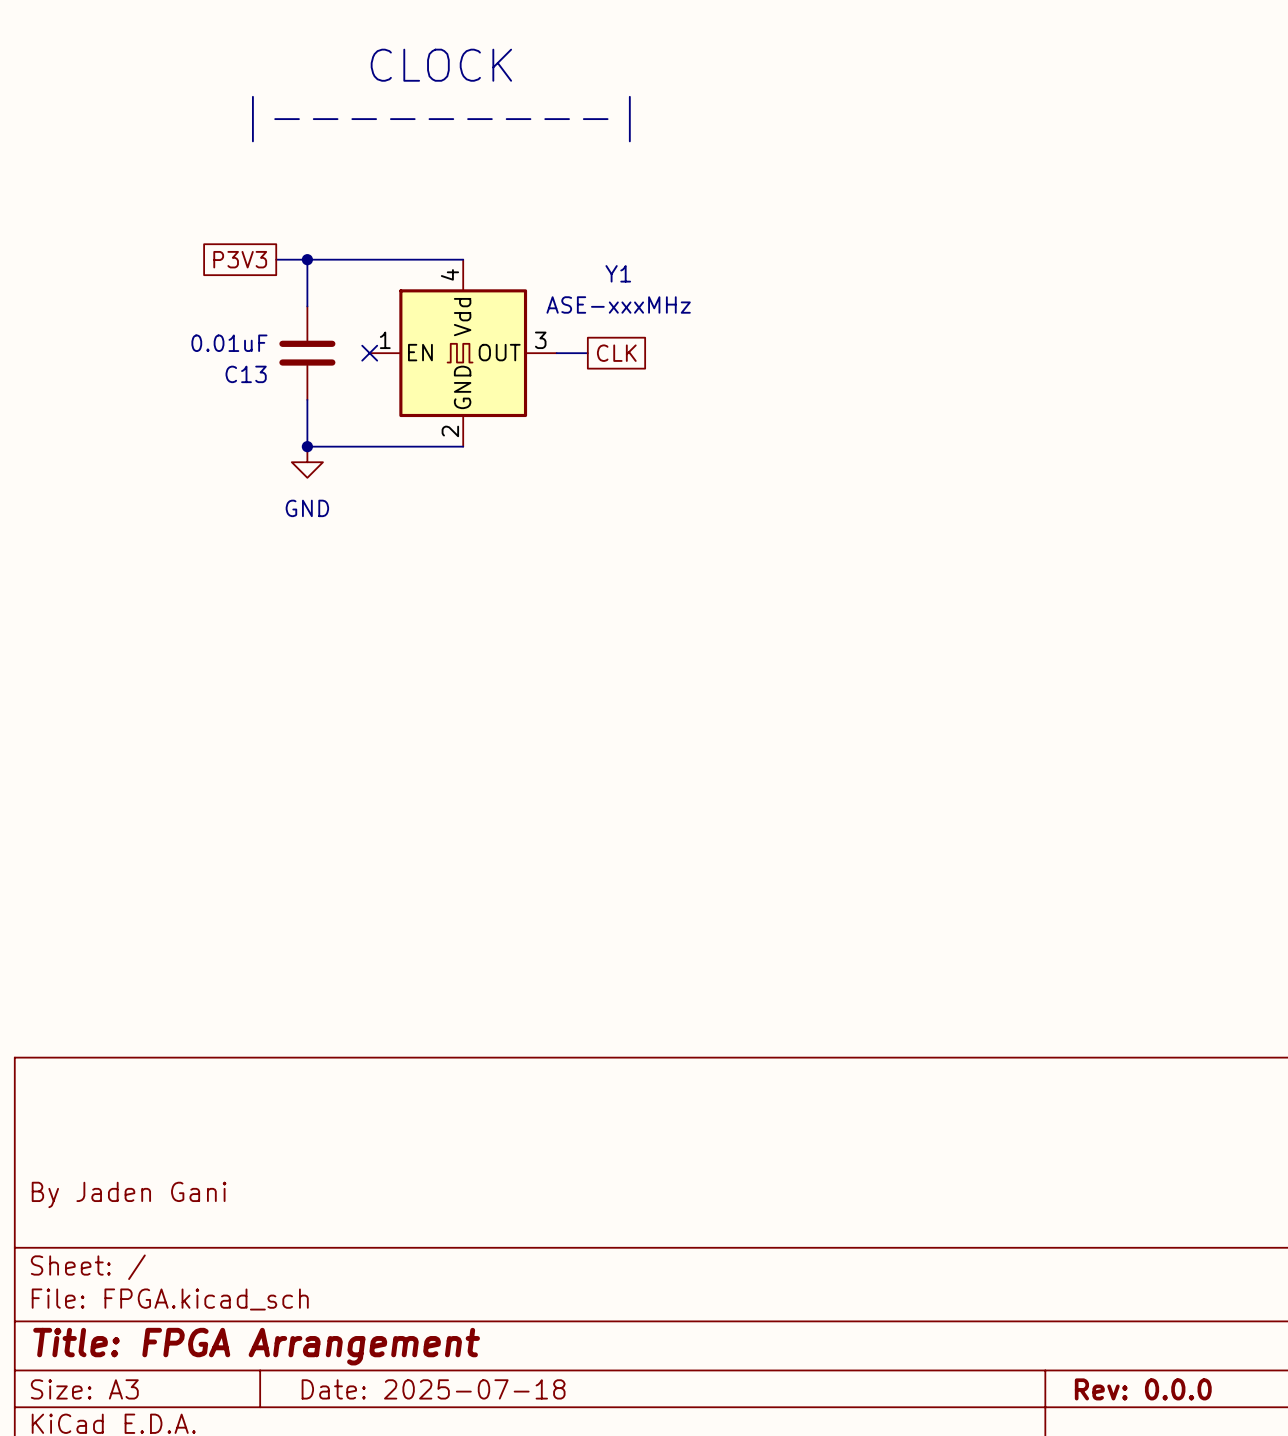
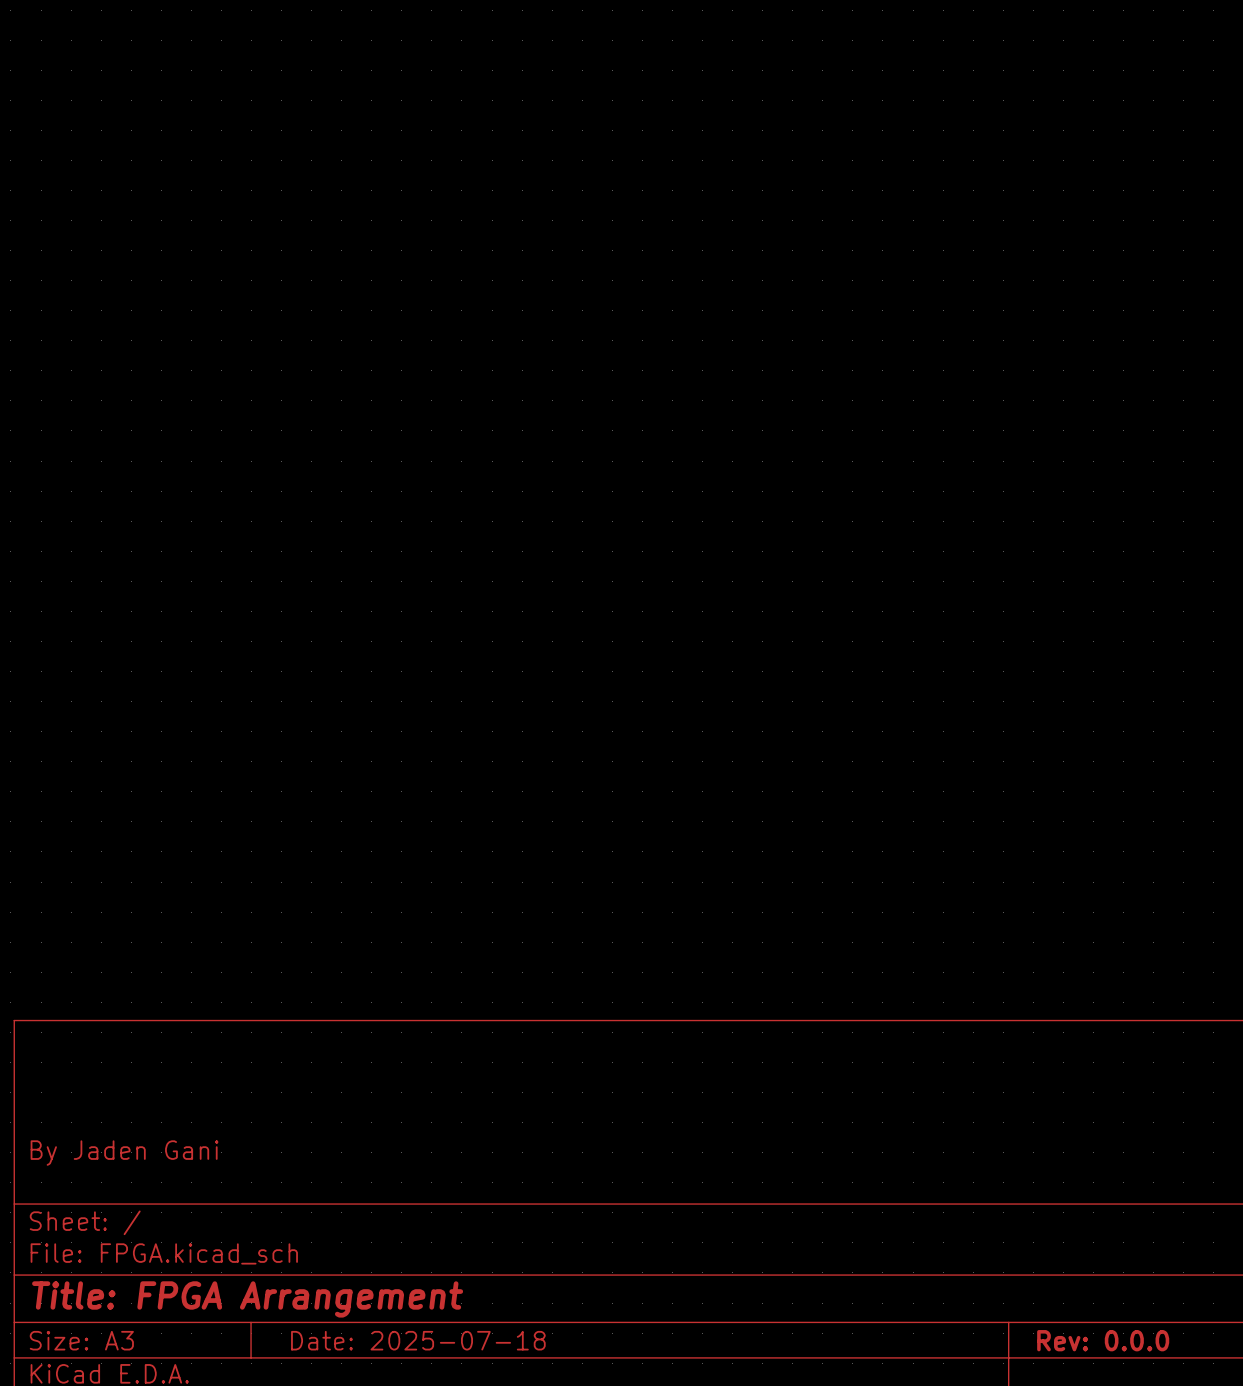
text: CLOCK (441, 65) -> none
text: |---------| (441, 119) -> none
global label: P3V3 (240, 259) -> none
wire: (276, 259) (463, 259) -> none
wire: (307, 259) (307, 306) -> none
junction: (307, 259) -> none
C13: 0.01uF (307, 353) -> none
no-connect mark: (369, 353) -> none
Y1: ASE-xxxMHz (463, 353) -> none
wire: (556, 353) (587, 353) -> none
global label: CLK (616, 353) -> none
wire: (307, 399) (307, 446) (463, 446) -> none
junction: (307, 446) -> none
power symbol: GND (307, 462) -> none

